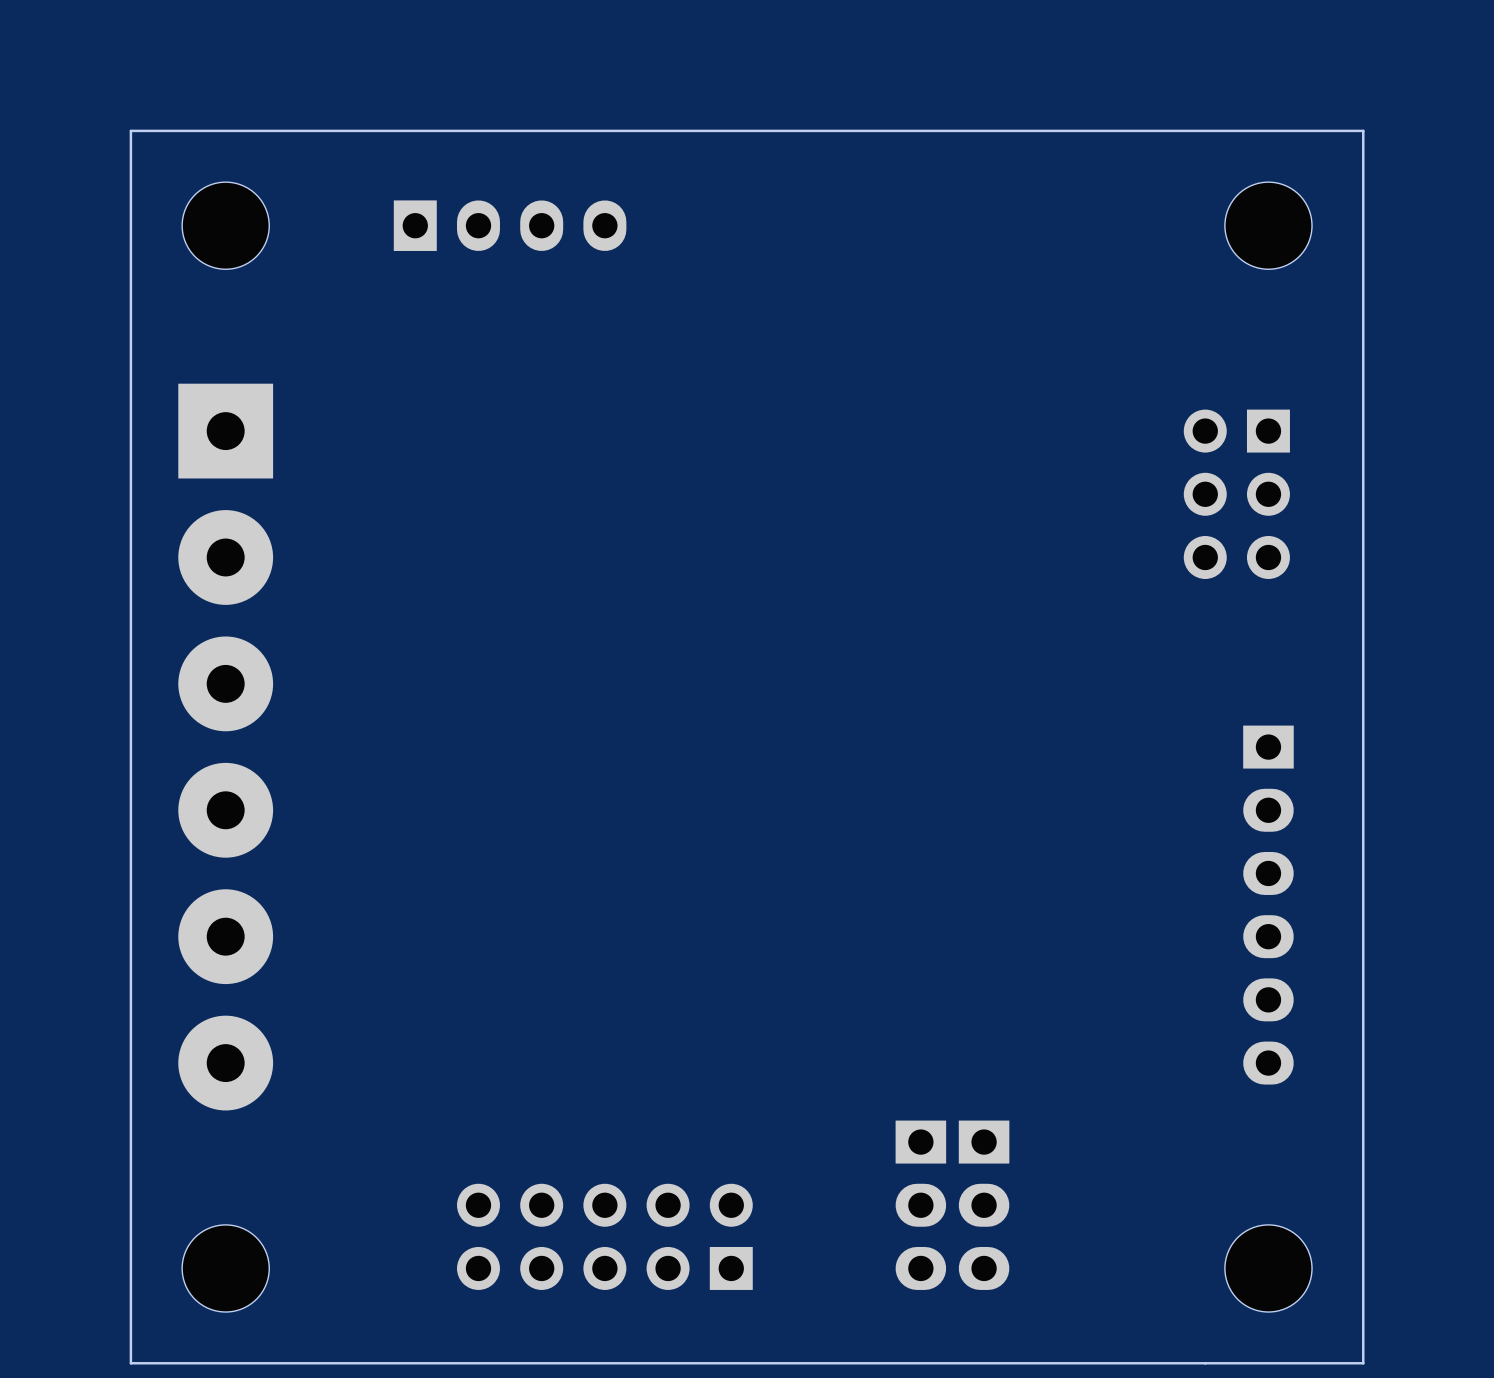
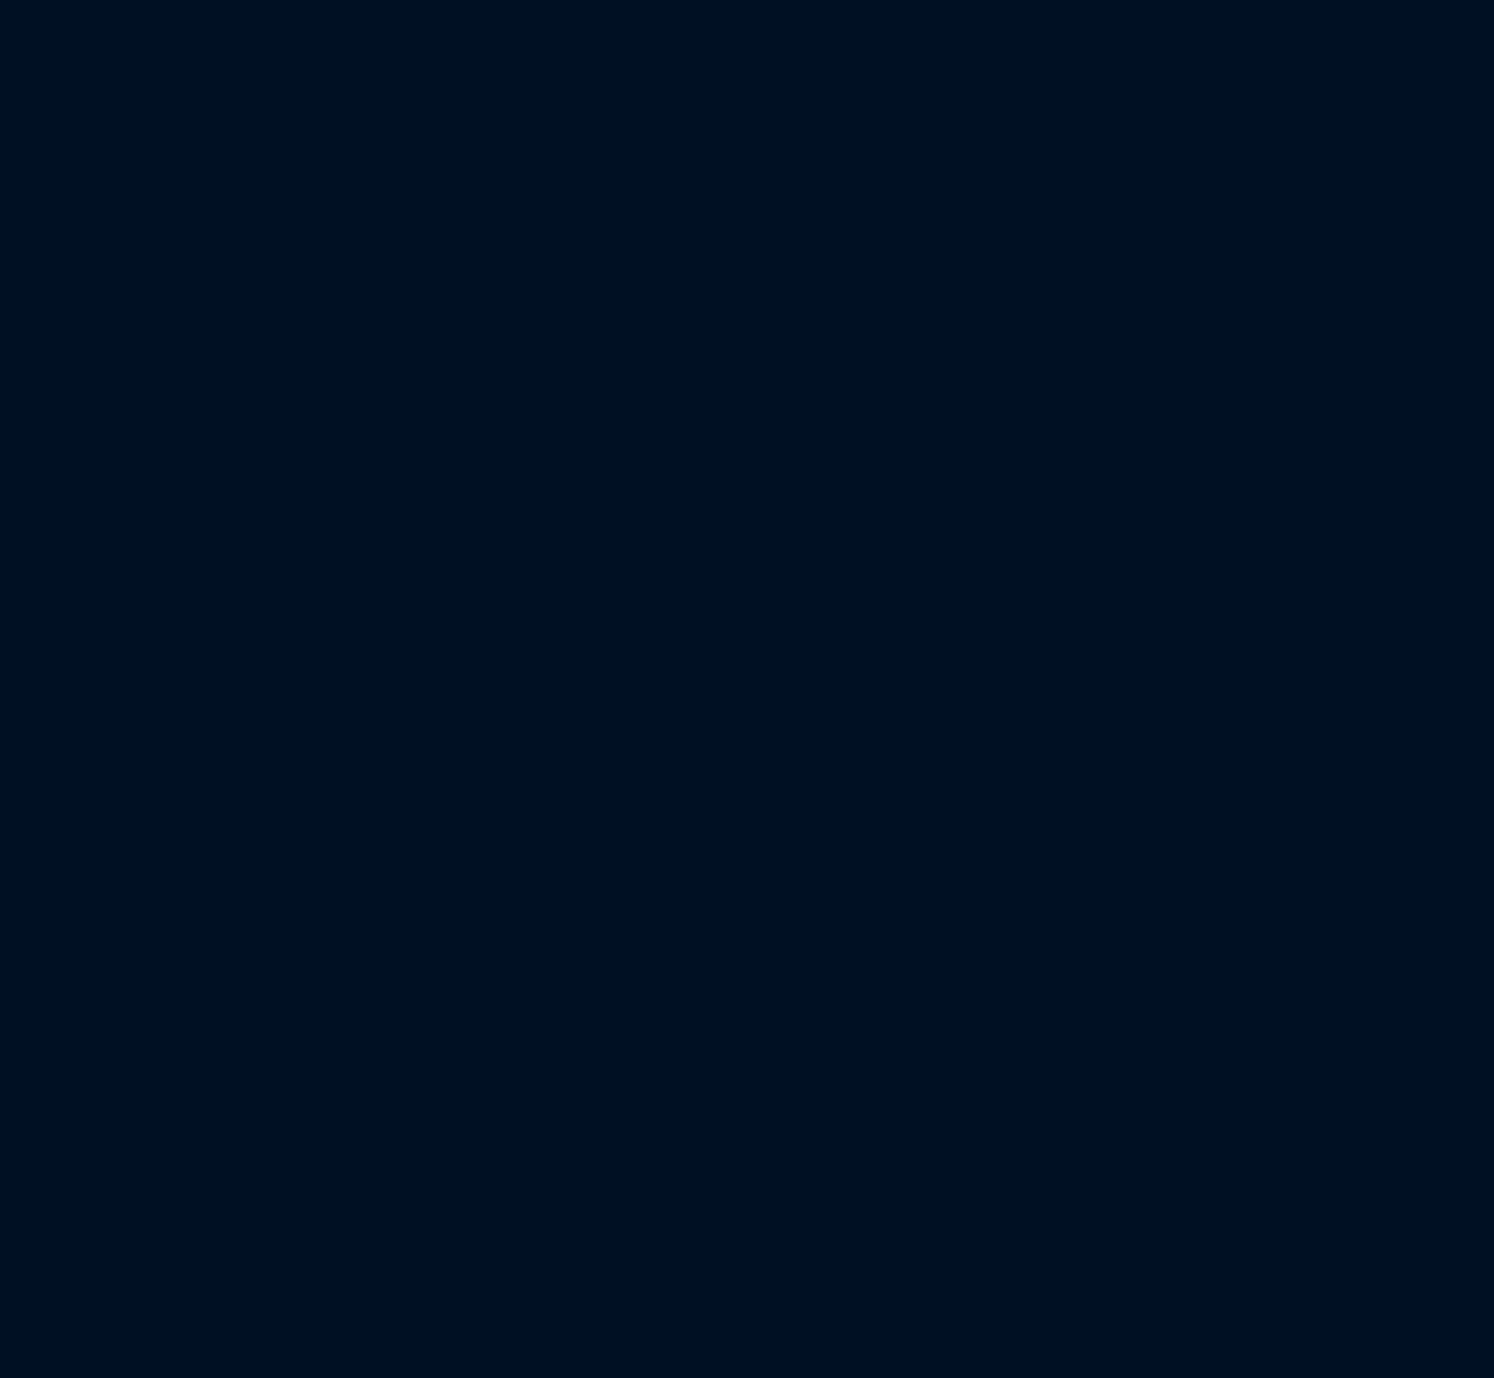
board edge: (1363, 130) (130, 130) (130, 1363) (1363, 1363) (1363, 130) -> none
part: (225, 225) -> none
part: (510, 225) -> none
part: (1268, 225) -> none
part: (1236, 494) -> none
part: (225, 747) -> none
part: (1268, 905) -> none
part: (920, 1205) -> none
part: (984, 1205) -> none
part: (604, 1236) -> none
part: (225, 1268) -> none
part: (1268, 1268) -> none

